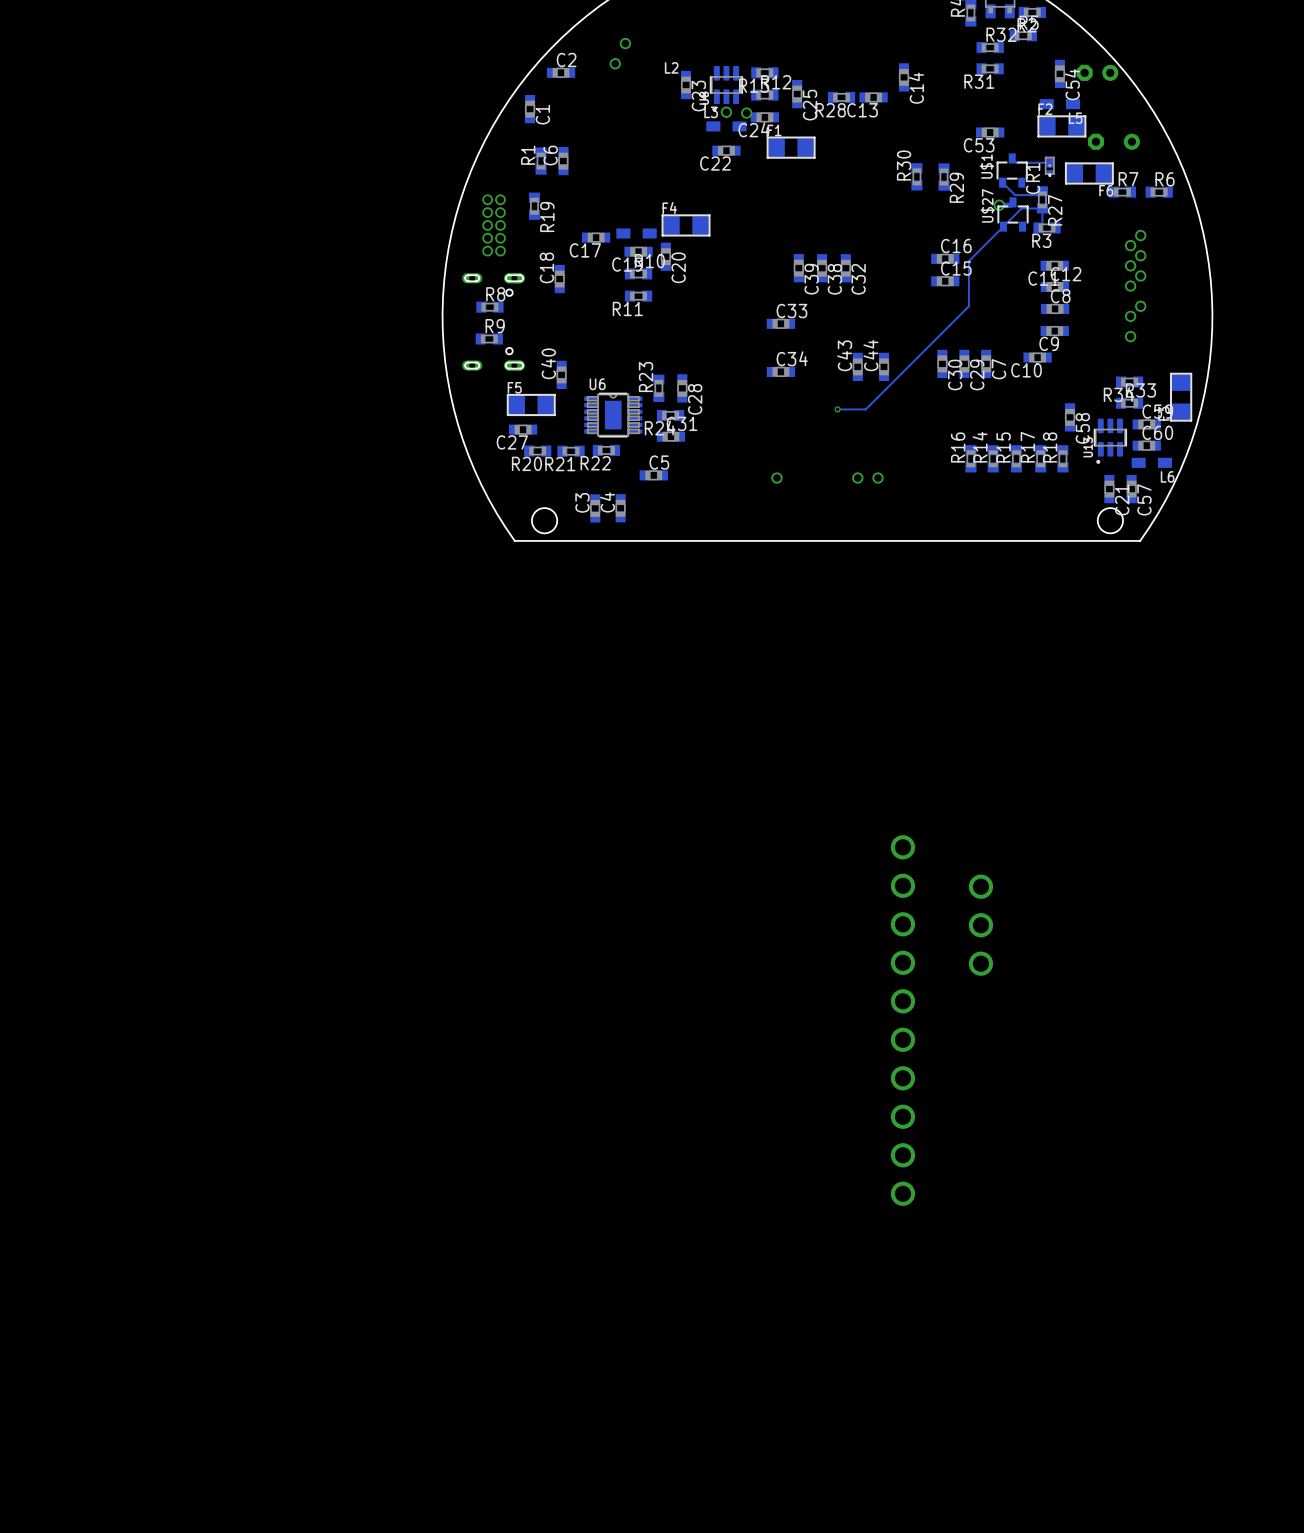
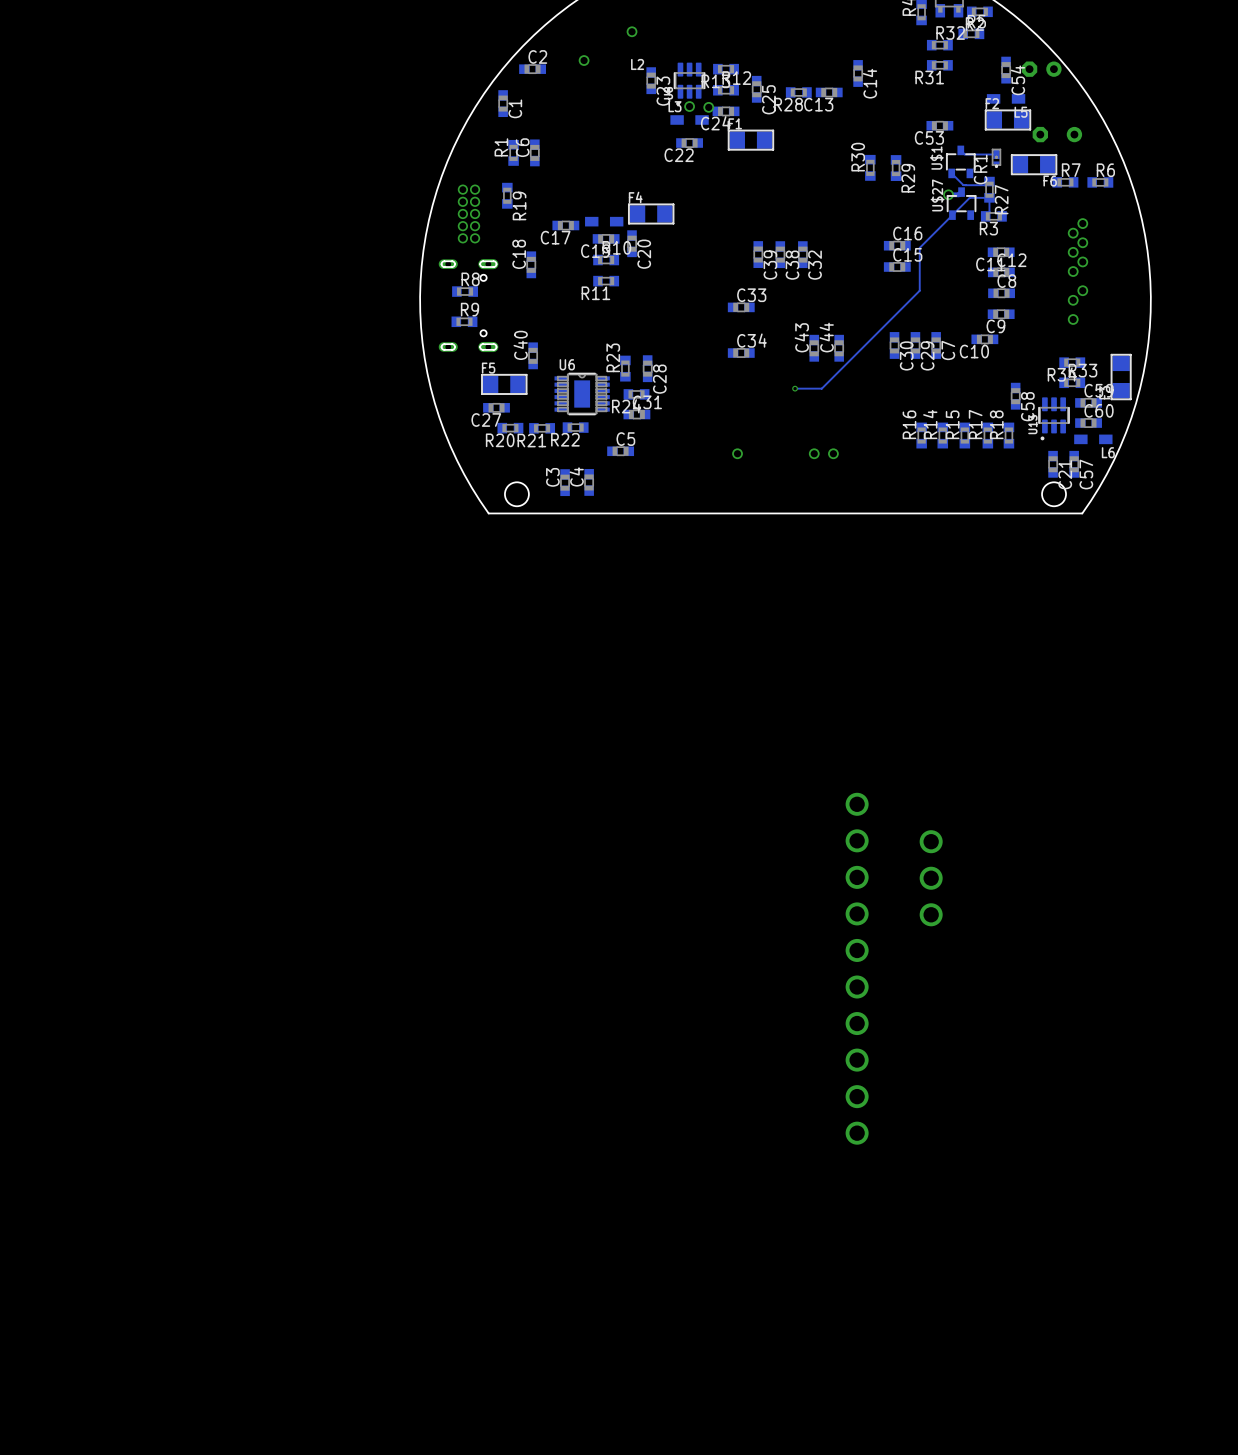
via position: (625, 43) -> (632, 31)

